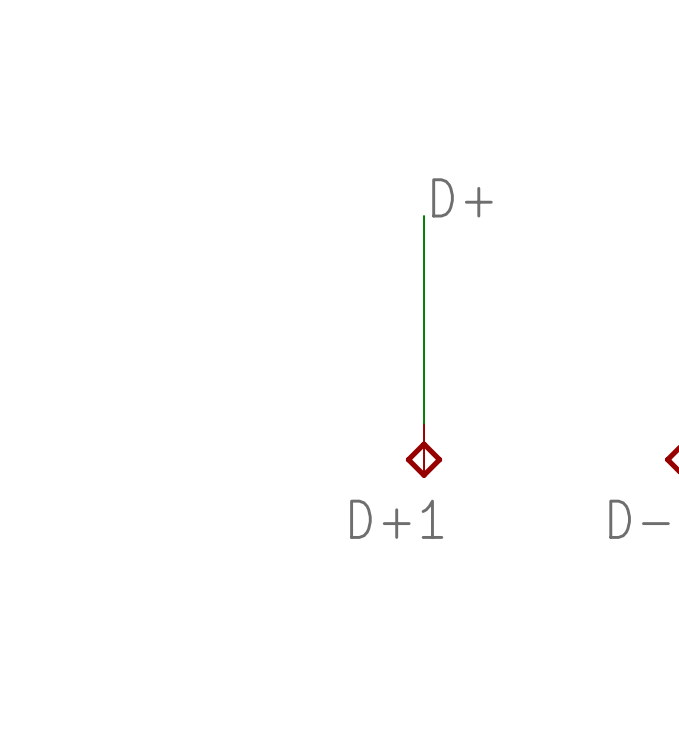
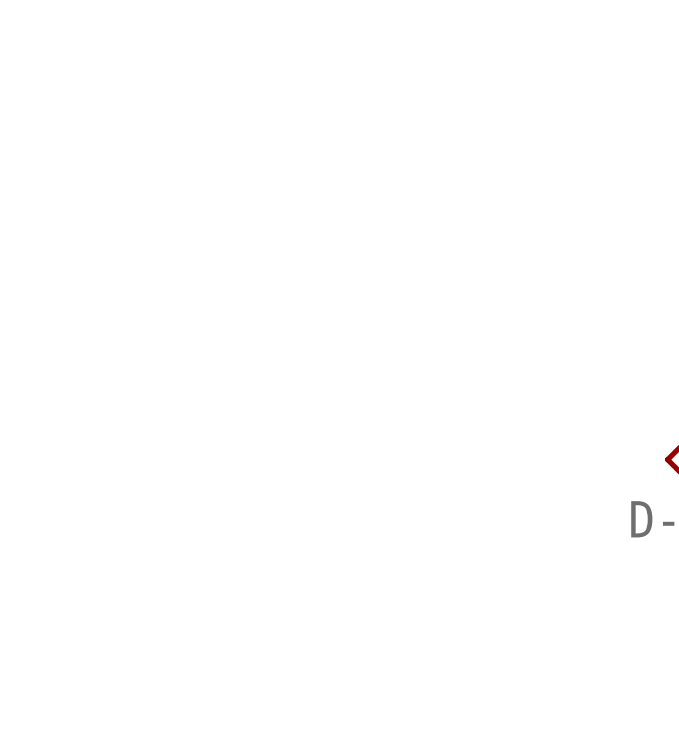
label: D+ (462, 197) -> none
wire: (424, 216) (424, 423) -> none
D+1: (424, 450) -> none

